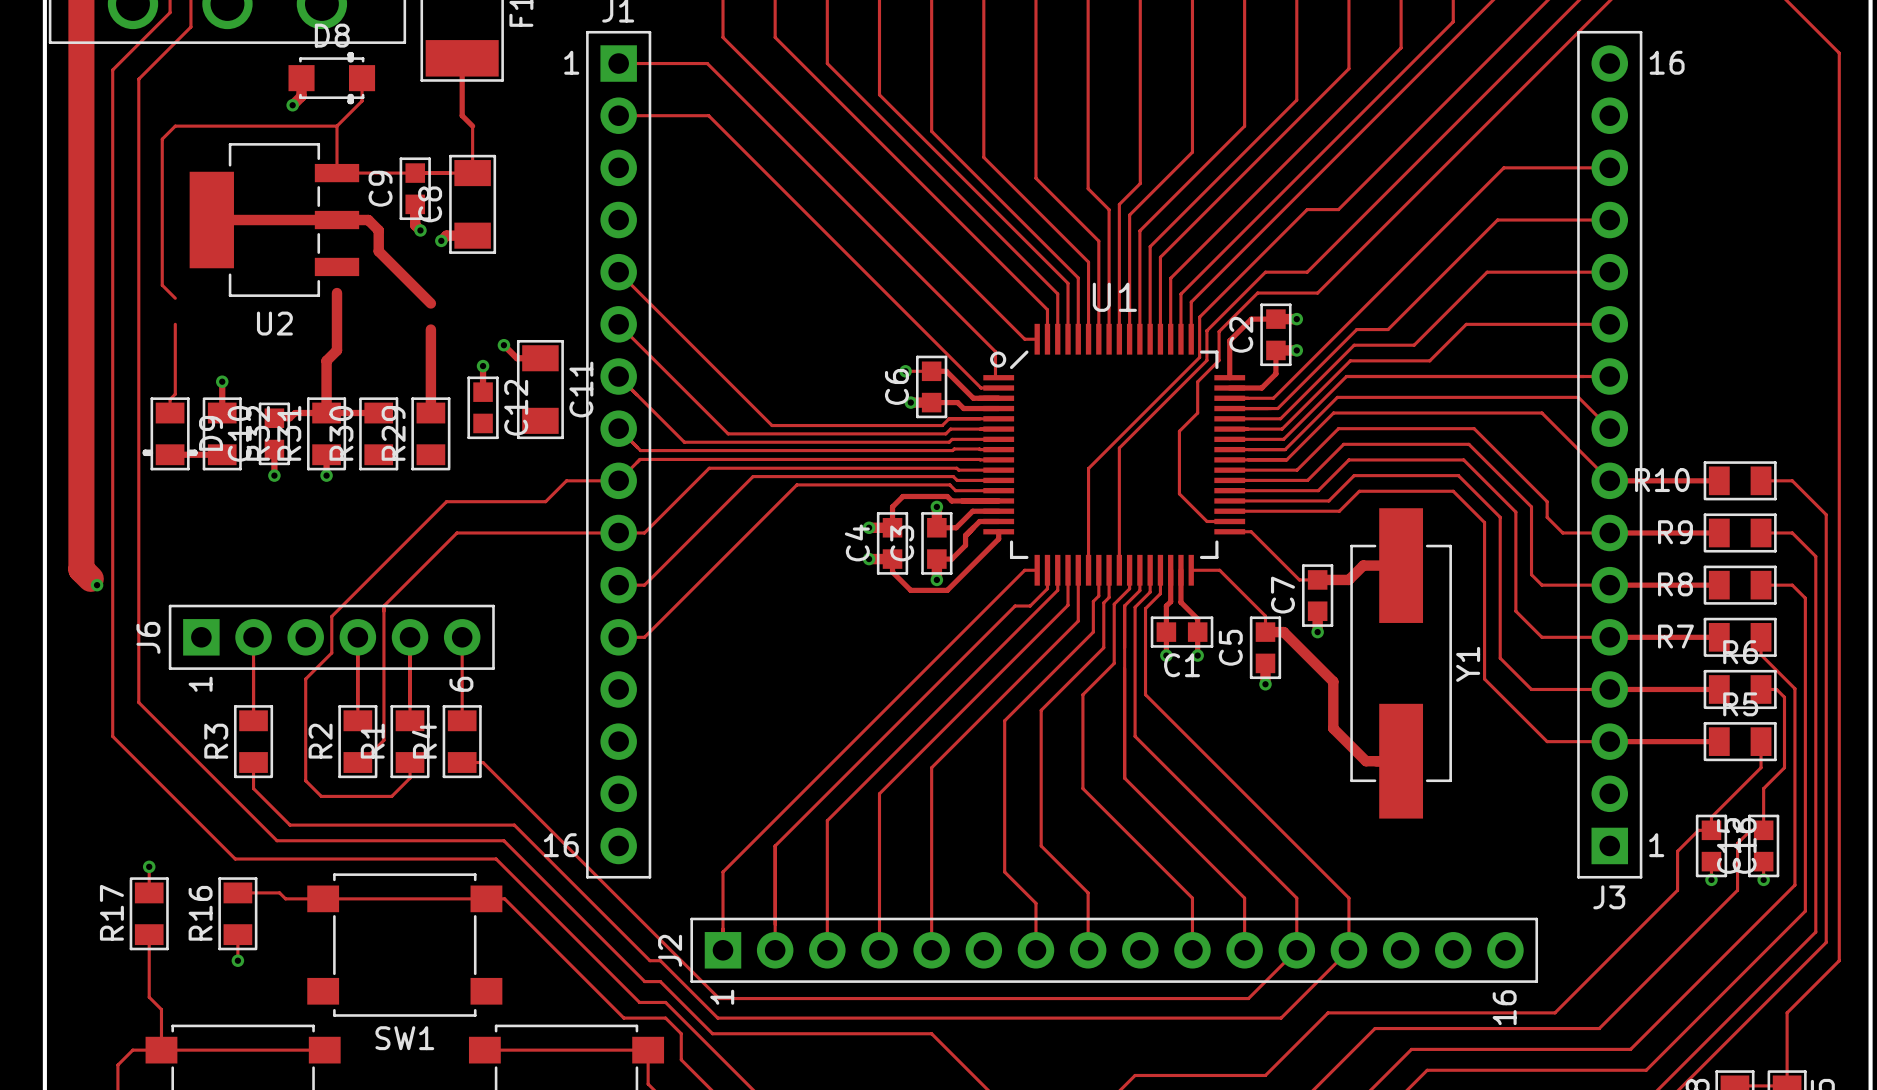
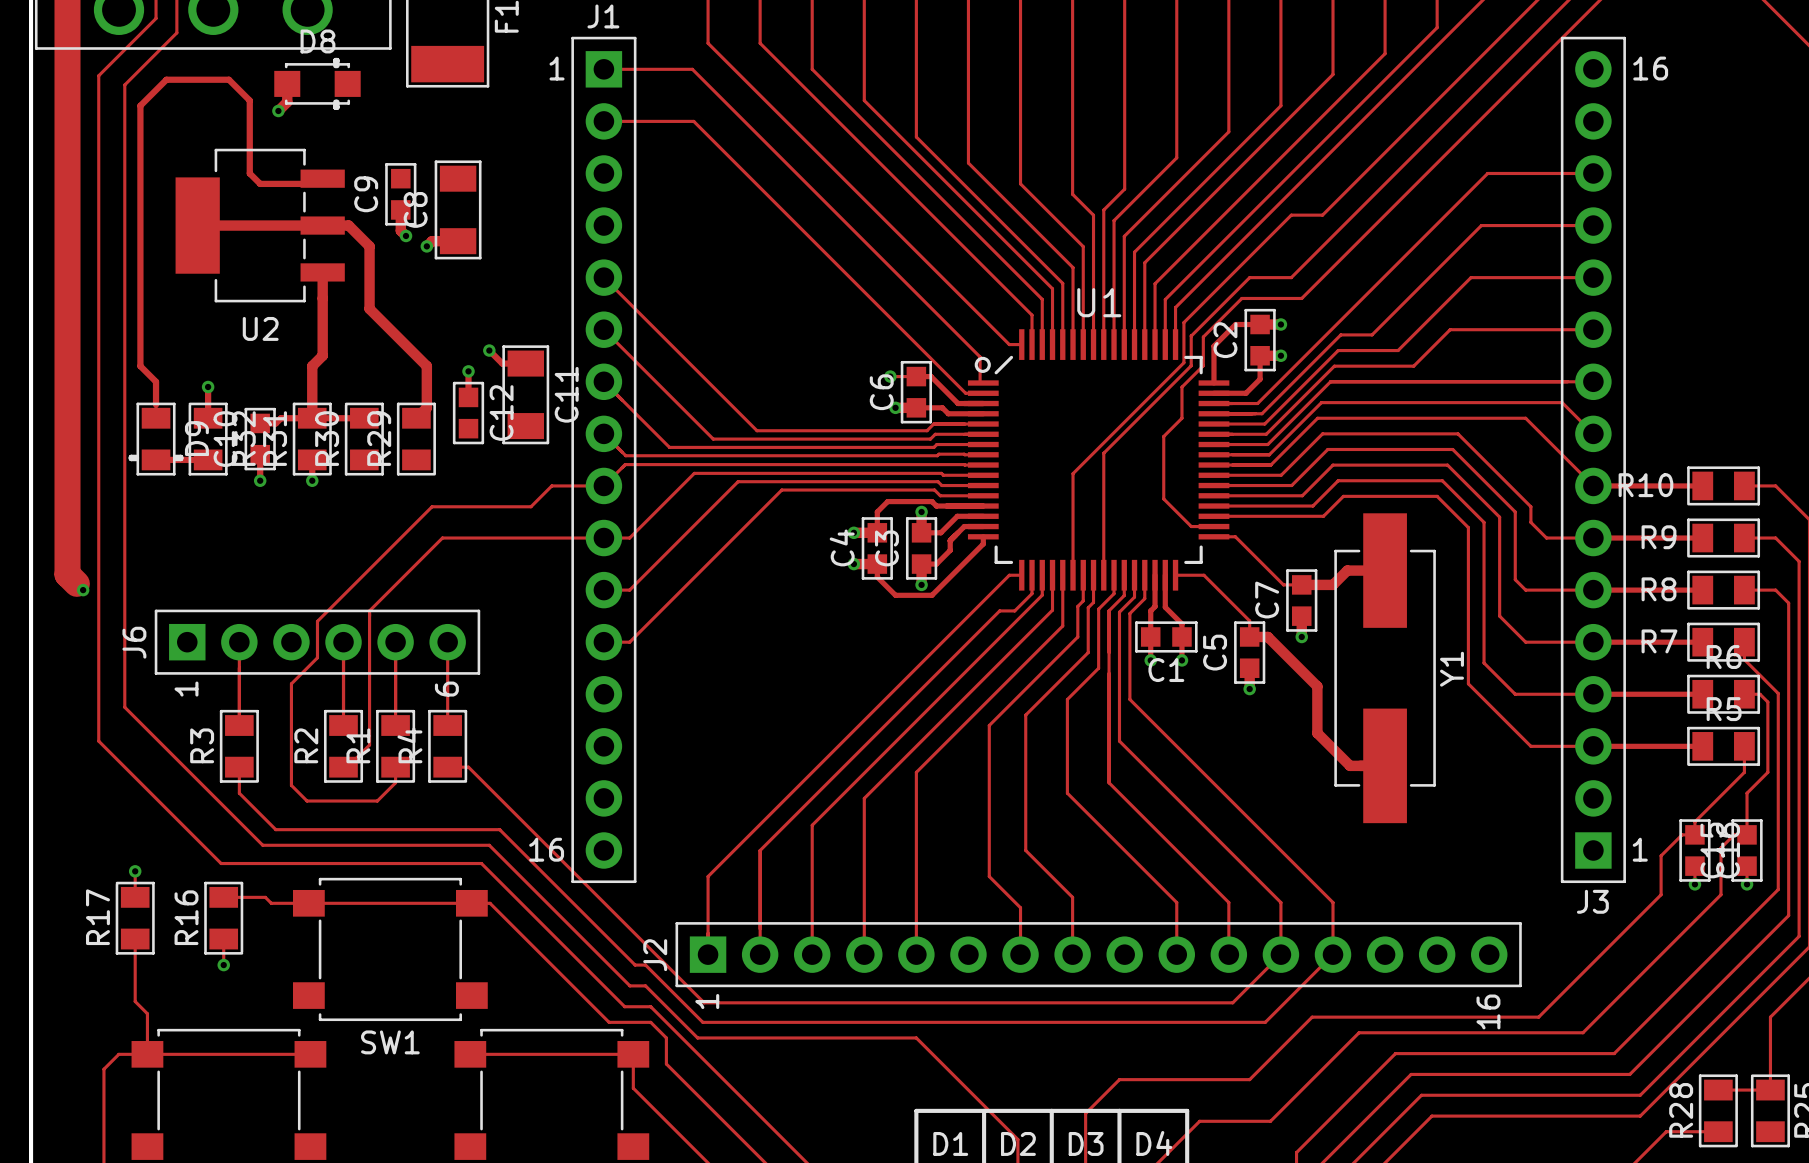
track: (462, 58) (462, 115) (472, 126) (472, 173) (337, 173) (337, 126) -> none
track: (362, 78) (362, 101) (337, 126) -> none
track: (337, 126) (175, 126) (162, 139) (162, 285) (175, 298) -> none
track: (363, 220) (368, 220) (378, 230) (378, 251) (430, 303) -> (348, 225) (369, 246) (369, 308) (426, 366) (426, 407) (416, 418)
track: none -> (322, 272) (322, 298)
track: (175, 324) (175, 394) (170, 399) -> (322, 178) (317, 183) (260, 183) (249, 173) (249, 100) (228, 79) (166, 79) (140, 105) (140, 366) (156, 381) (156, 404)
track: (430, 329) (430, 413) -> none

